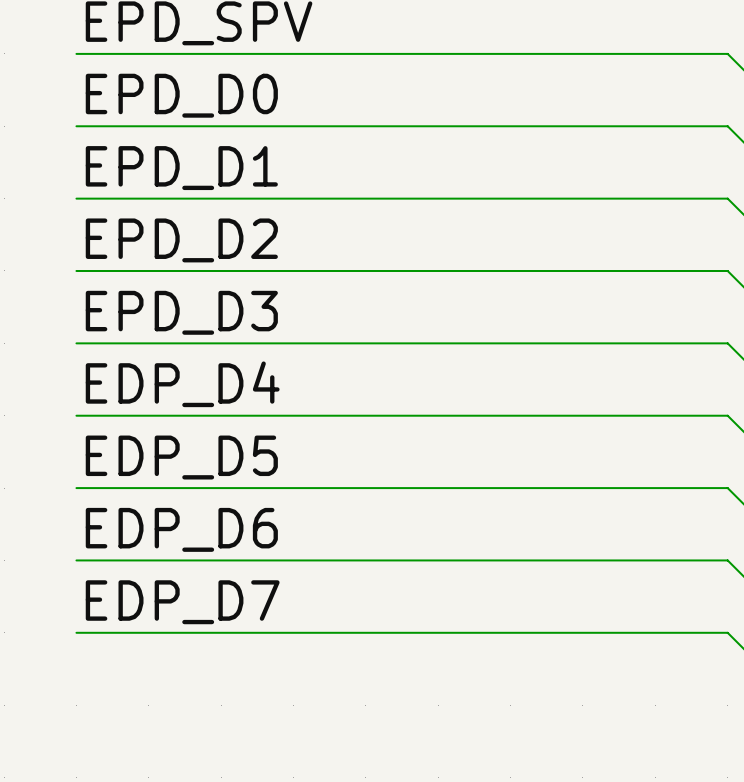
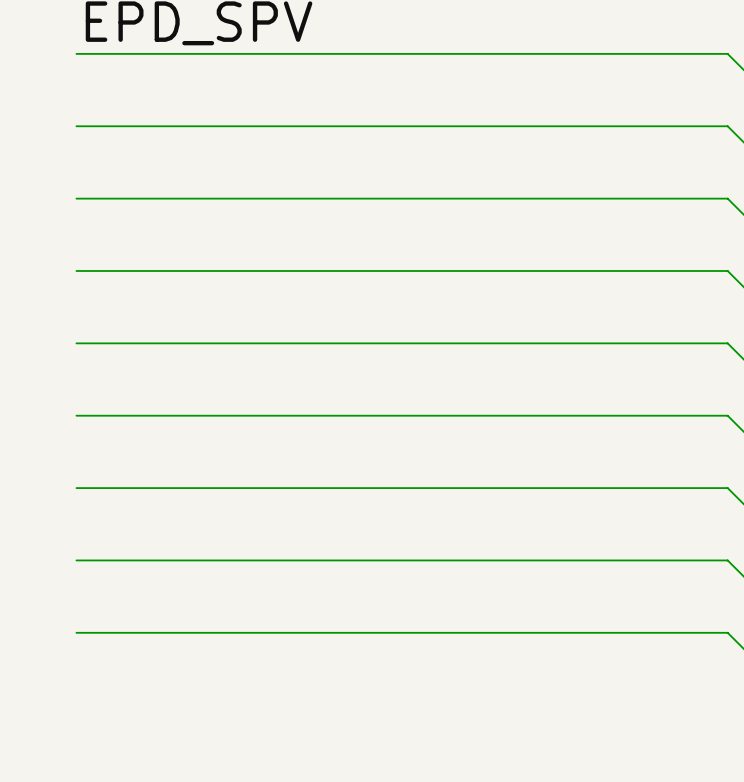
label: EPD_D0 (181, 95) -> none
label: EPD_D1 (181, 168) -> none
label: EPD_D2 (181, 240) -> none
label: EPD_D3 (181, 312) -> none
label: EDP_D4 (182, 384) -> none
label: EDP_D5 (181, 457) -> none
label: EDP_D6 (181, 529) -> none
label: EDP_D7 (182, 602) -> none

